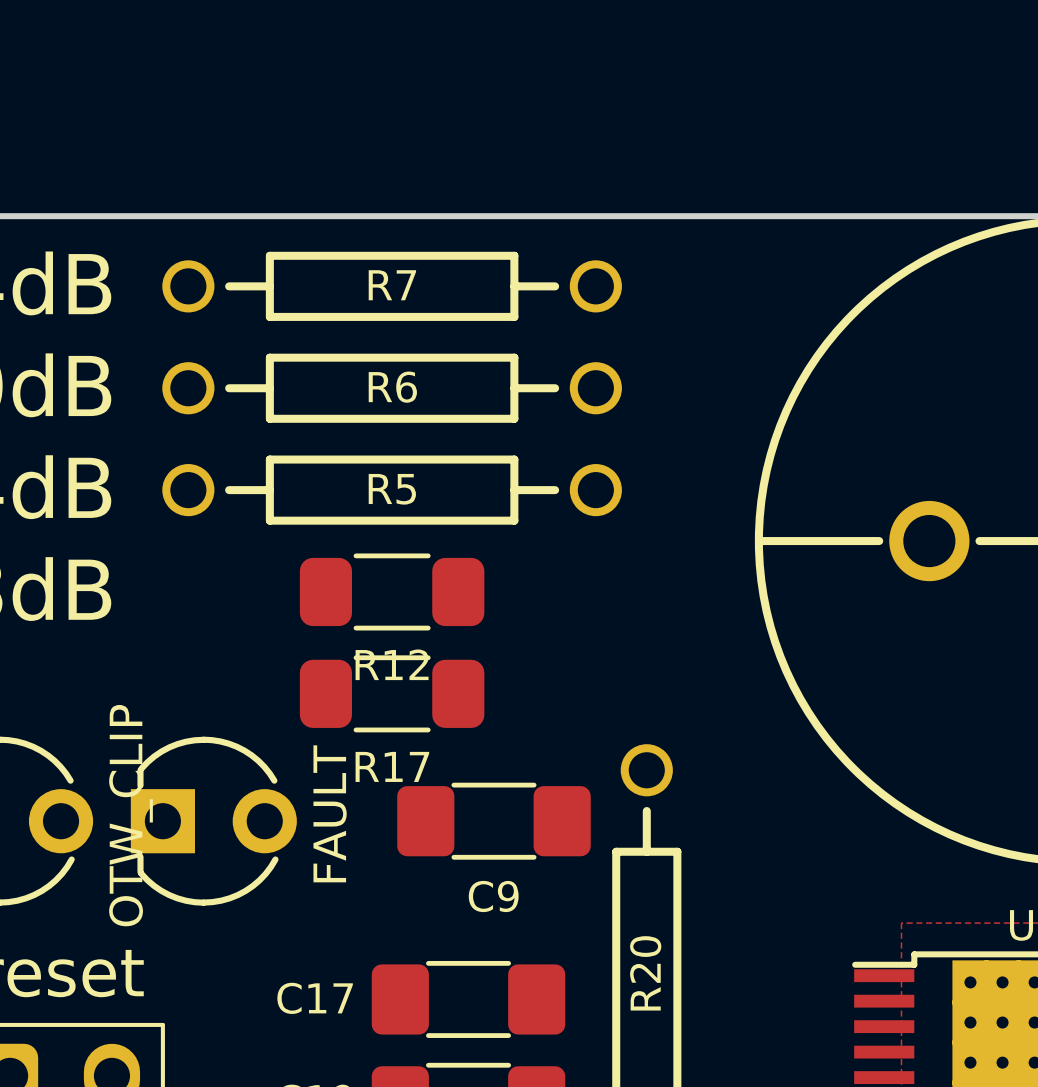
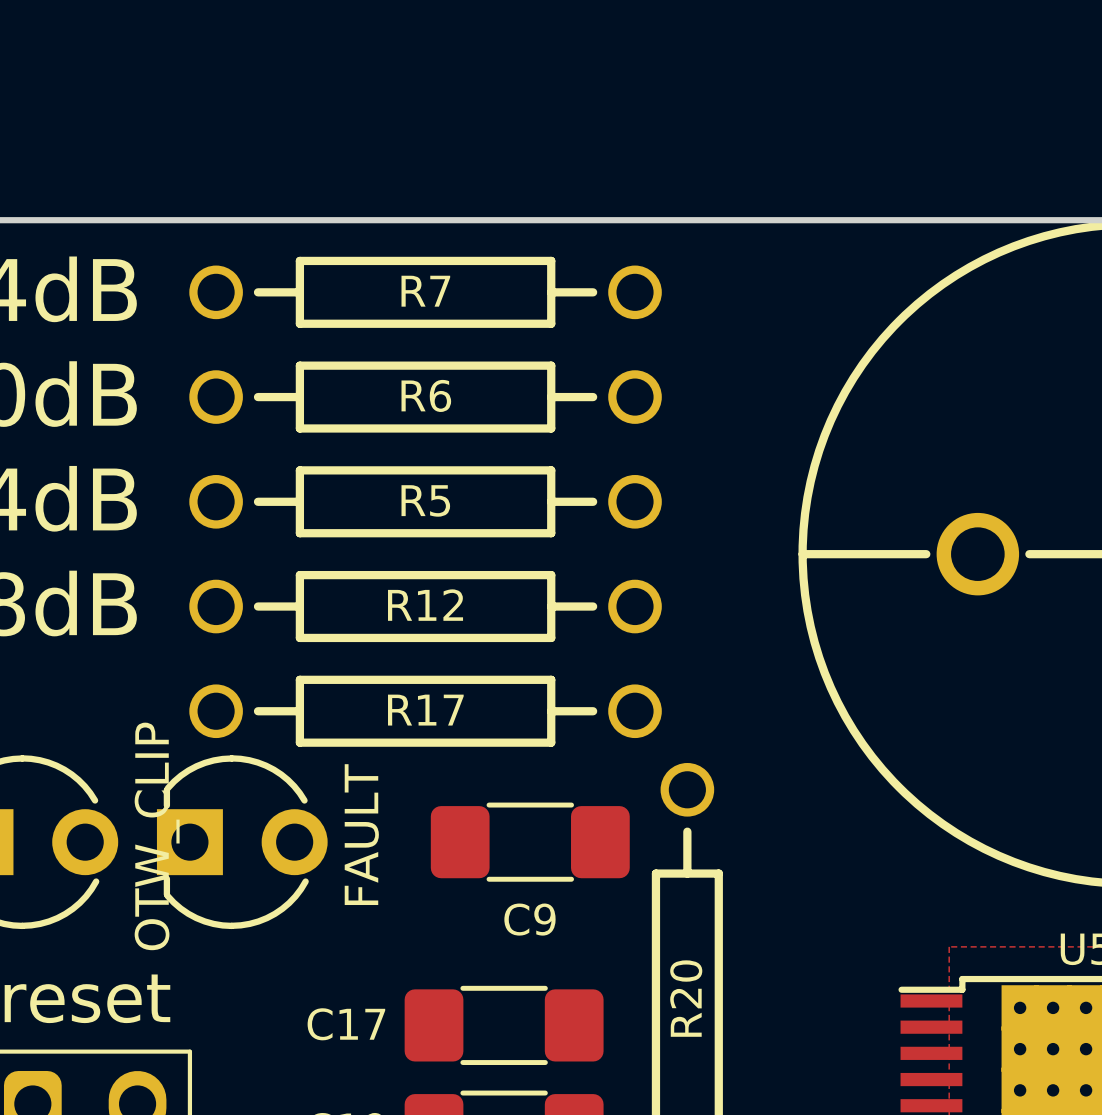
R12 footprint: [299, 553, 485, 631] -> [189, 570, 662, 643]
R17 footprint: [299, 655, 485, 733] -> [189, 675, 662, 747]

